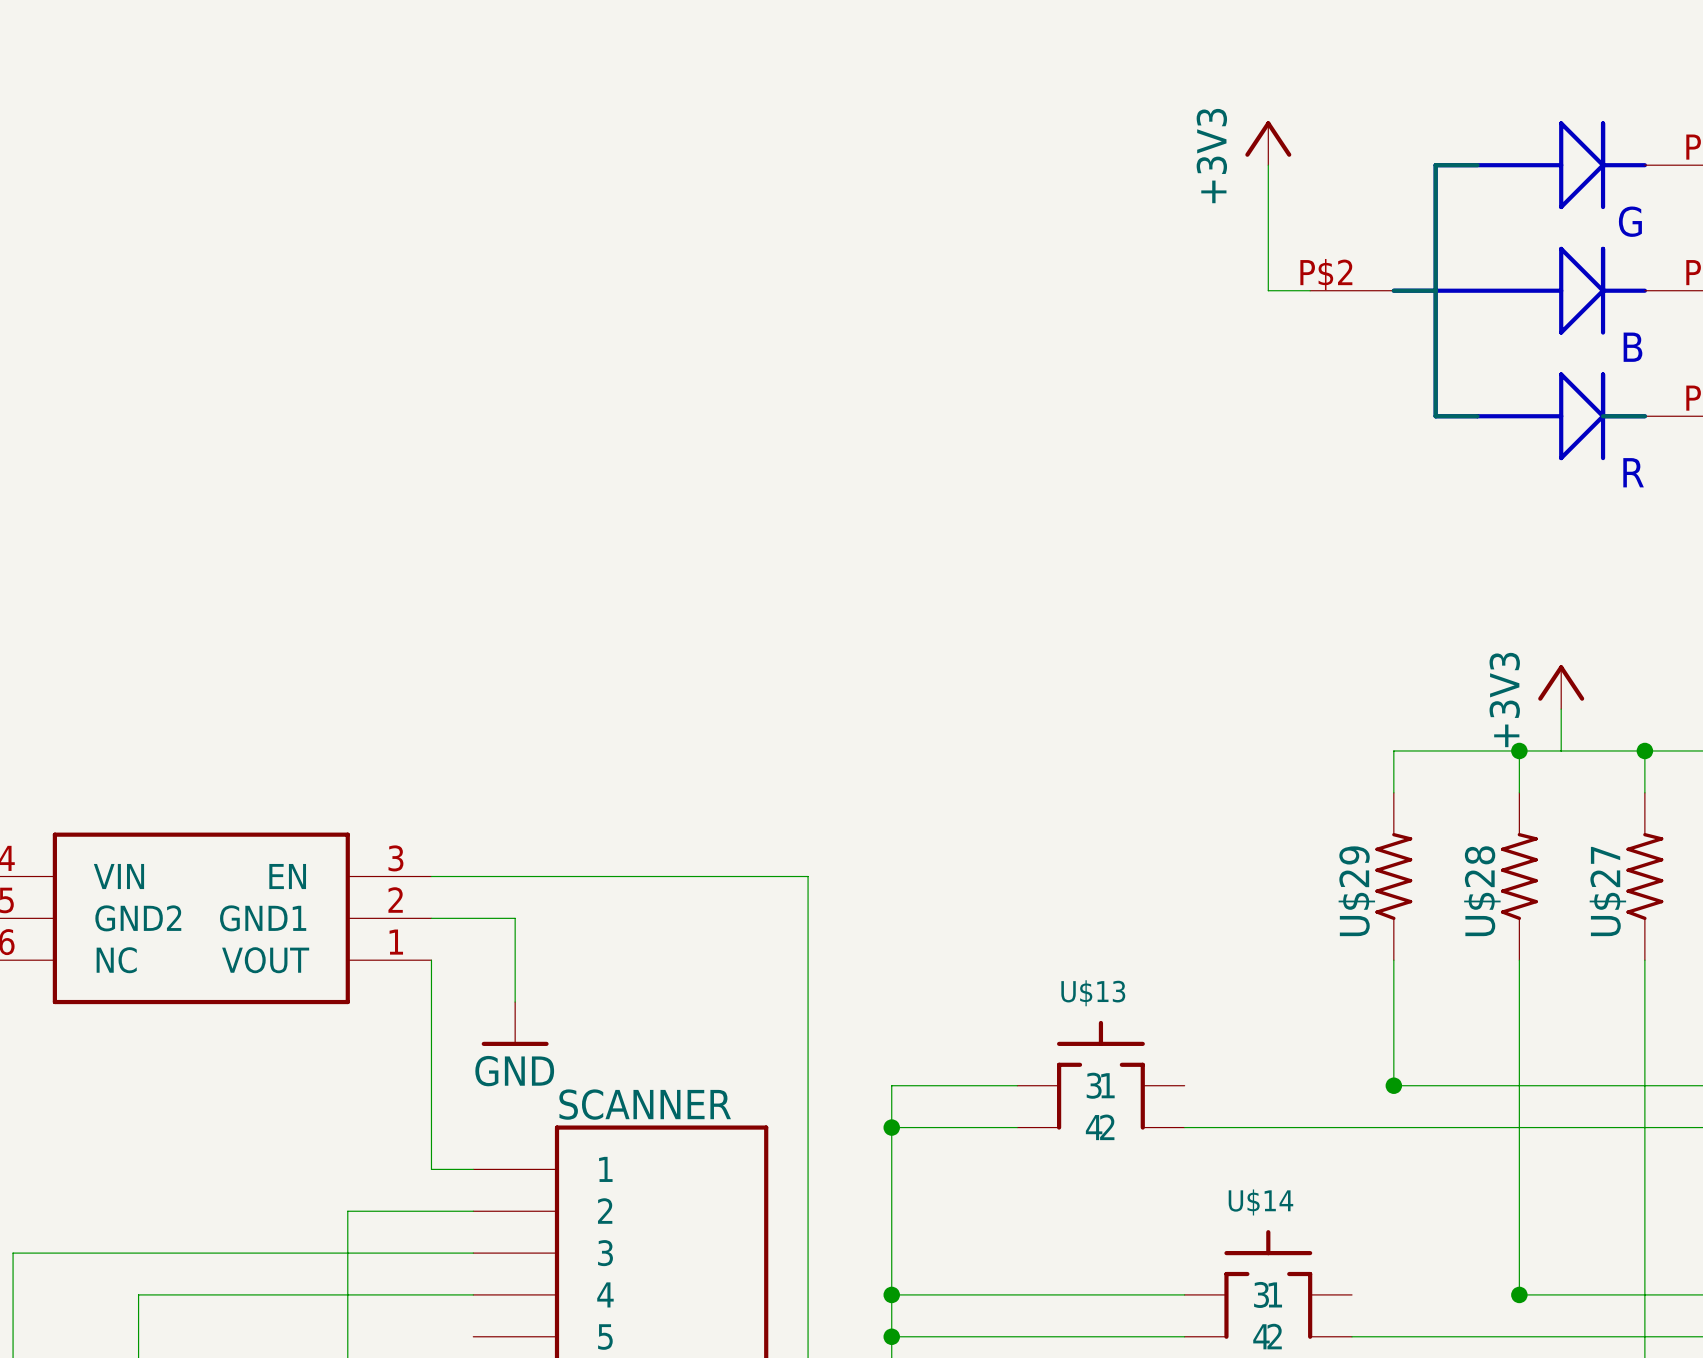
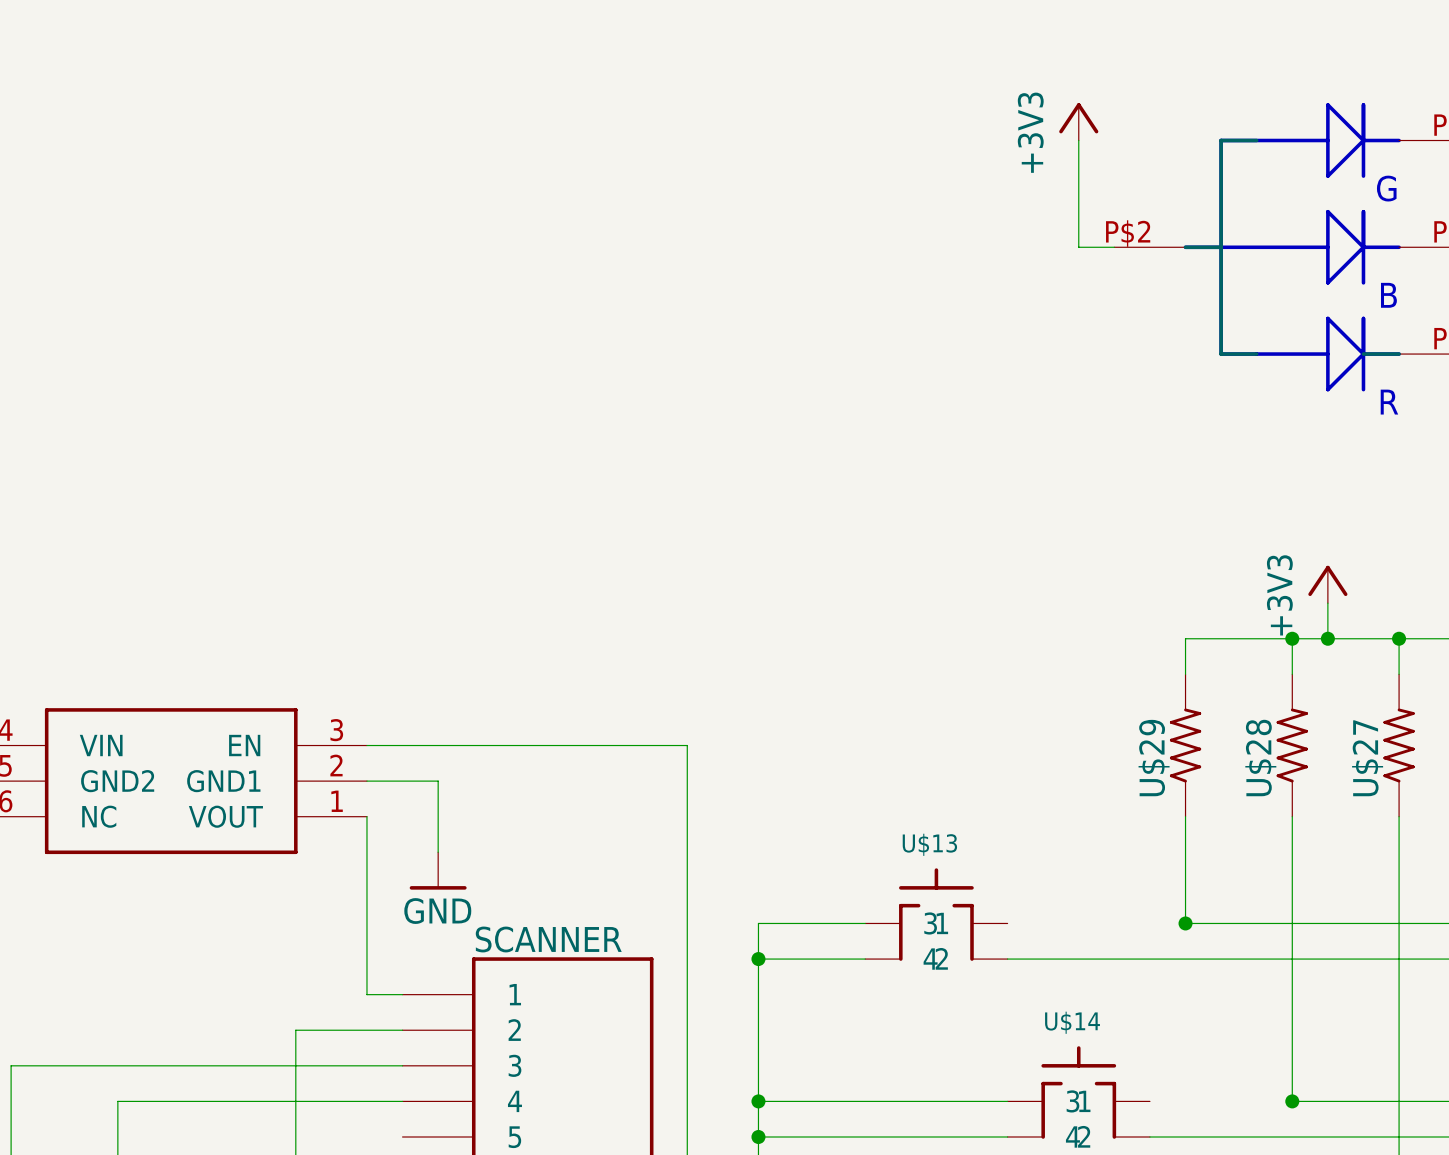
junction: none -> (1327, 638)

